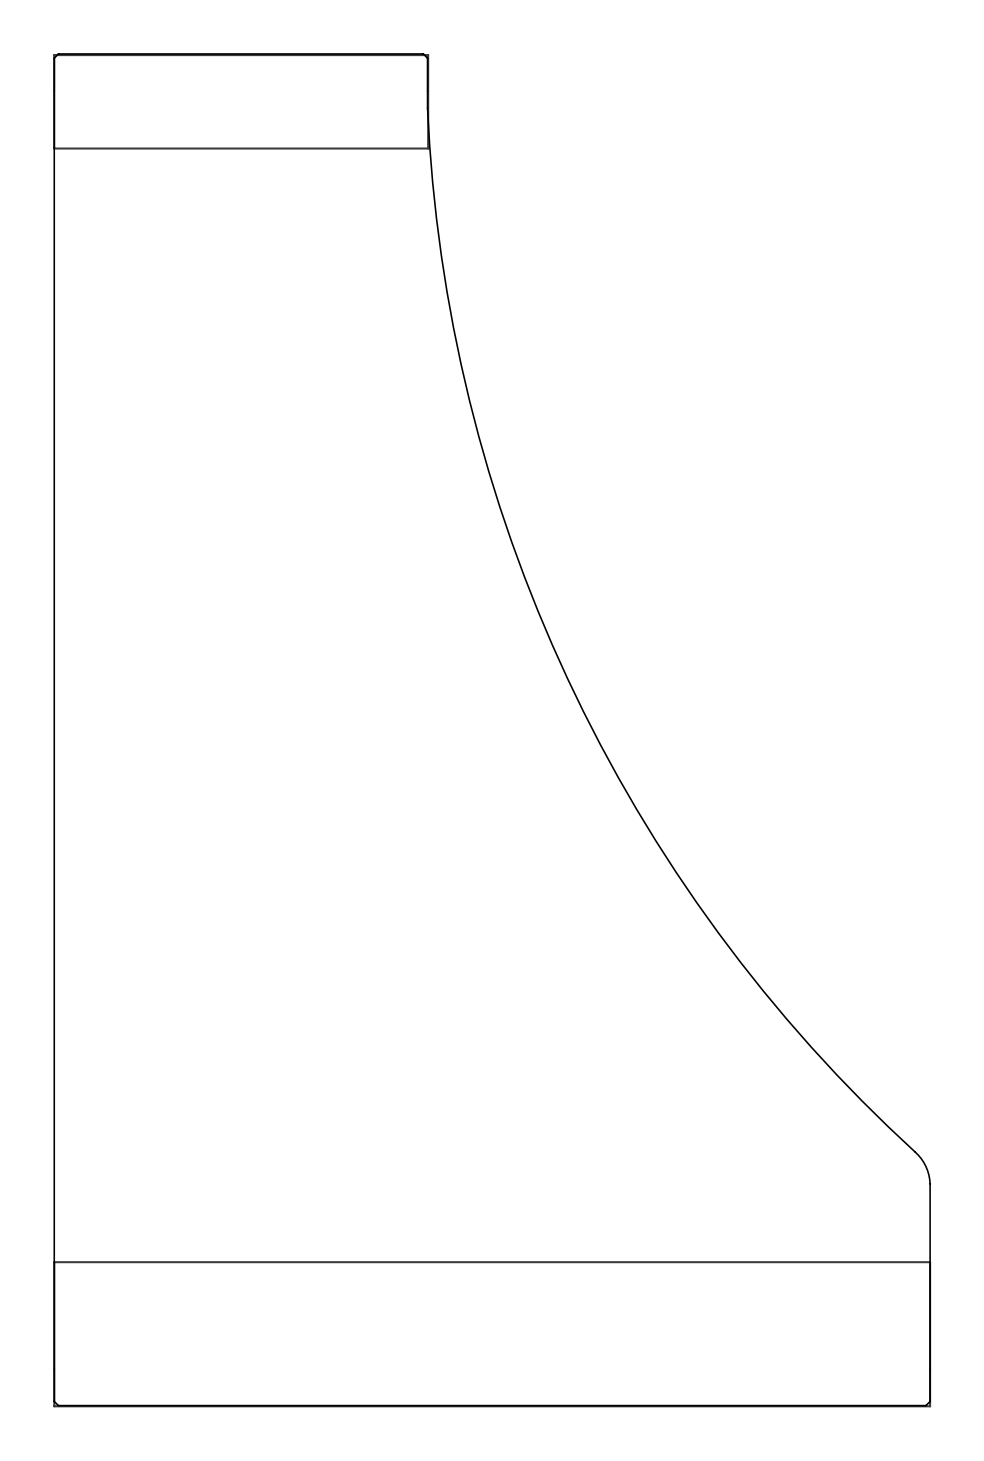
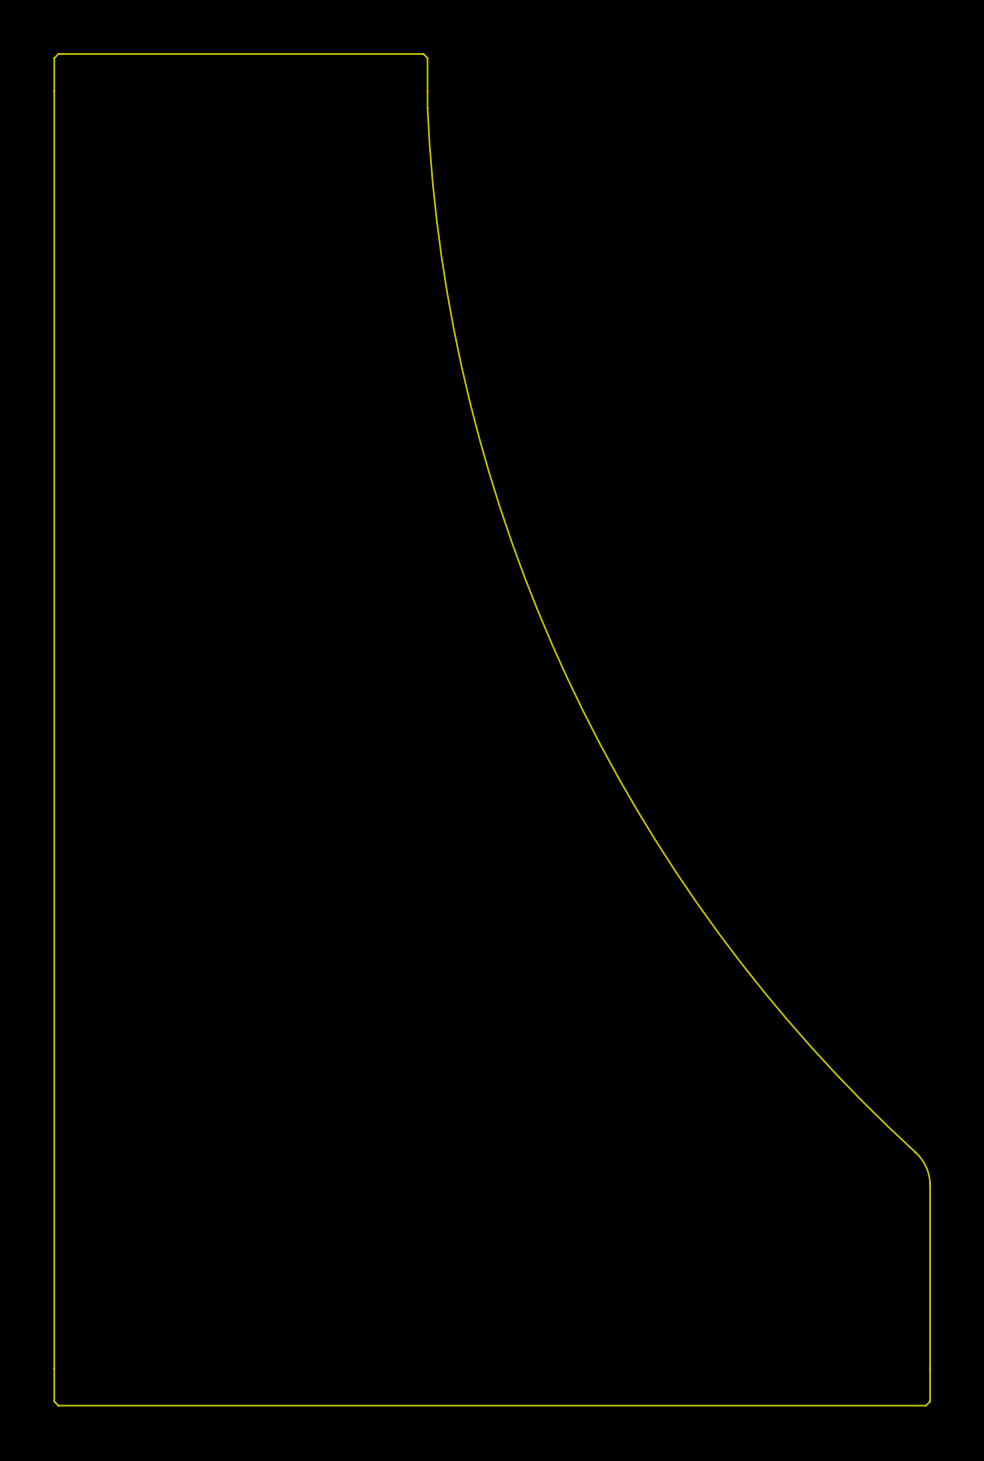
line: (428, 55) (54, 55) (54, 148) (428, 148) (428, 55) -> none
line: (930, 1262) (54, 1262) (54, 1406) (930, 1406) (930, 1262) -> none

